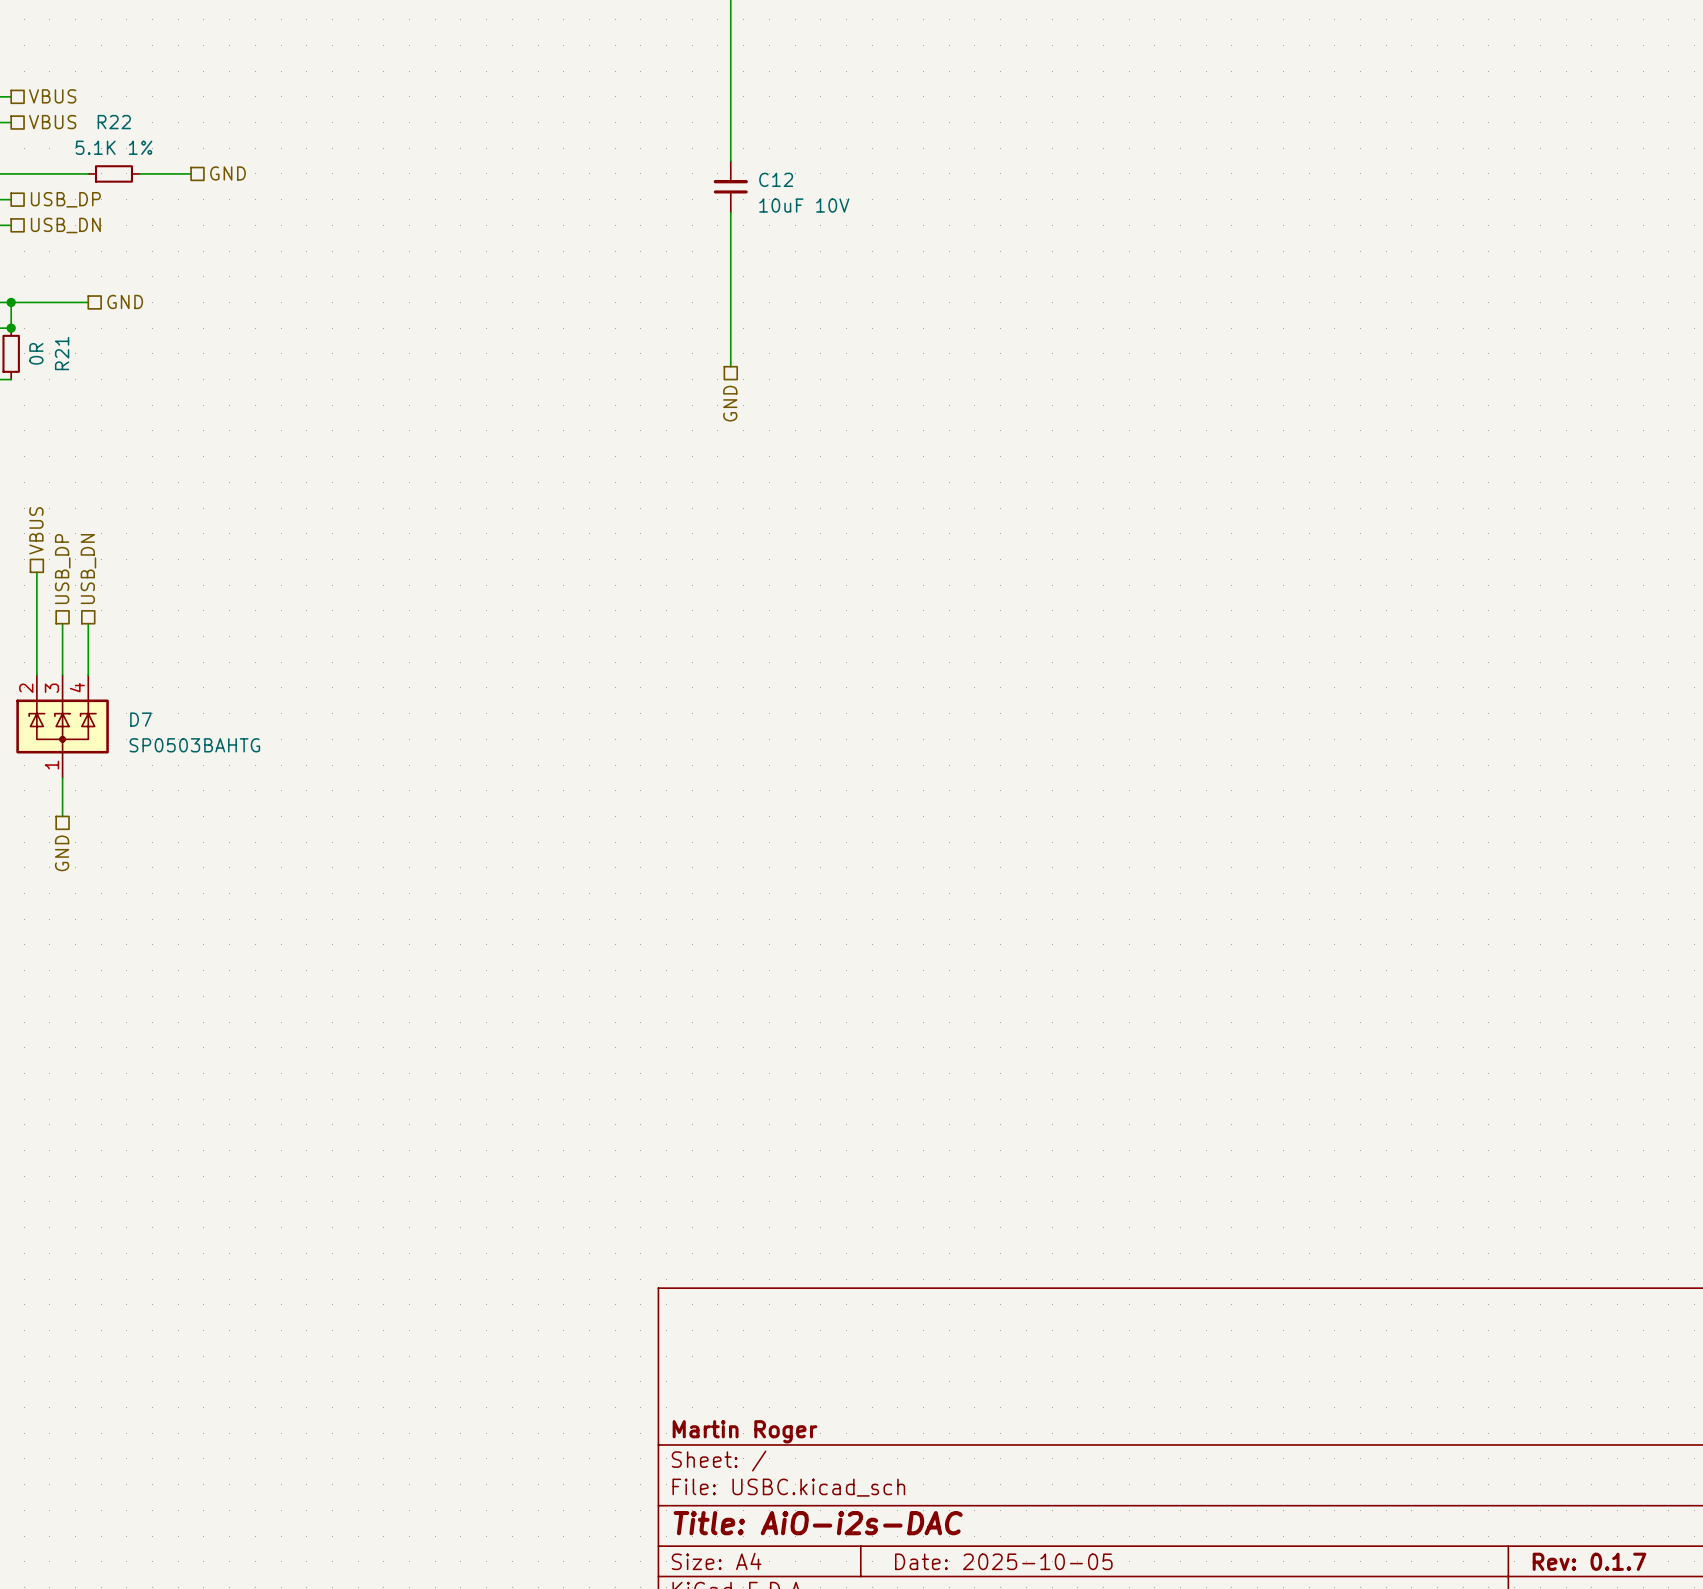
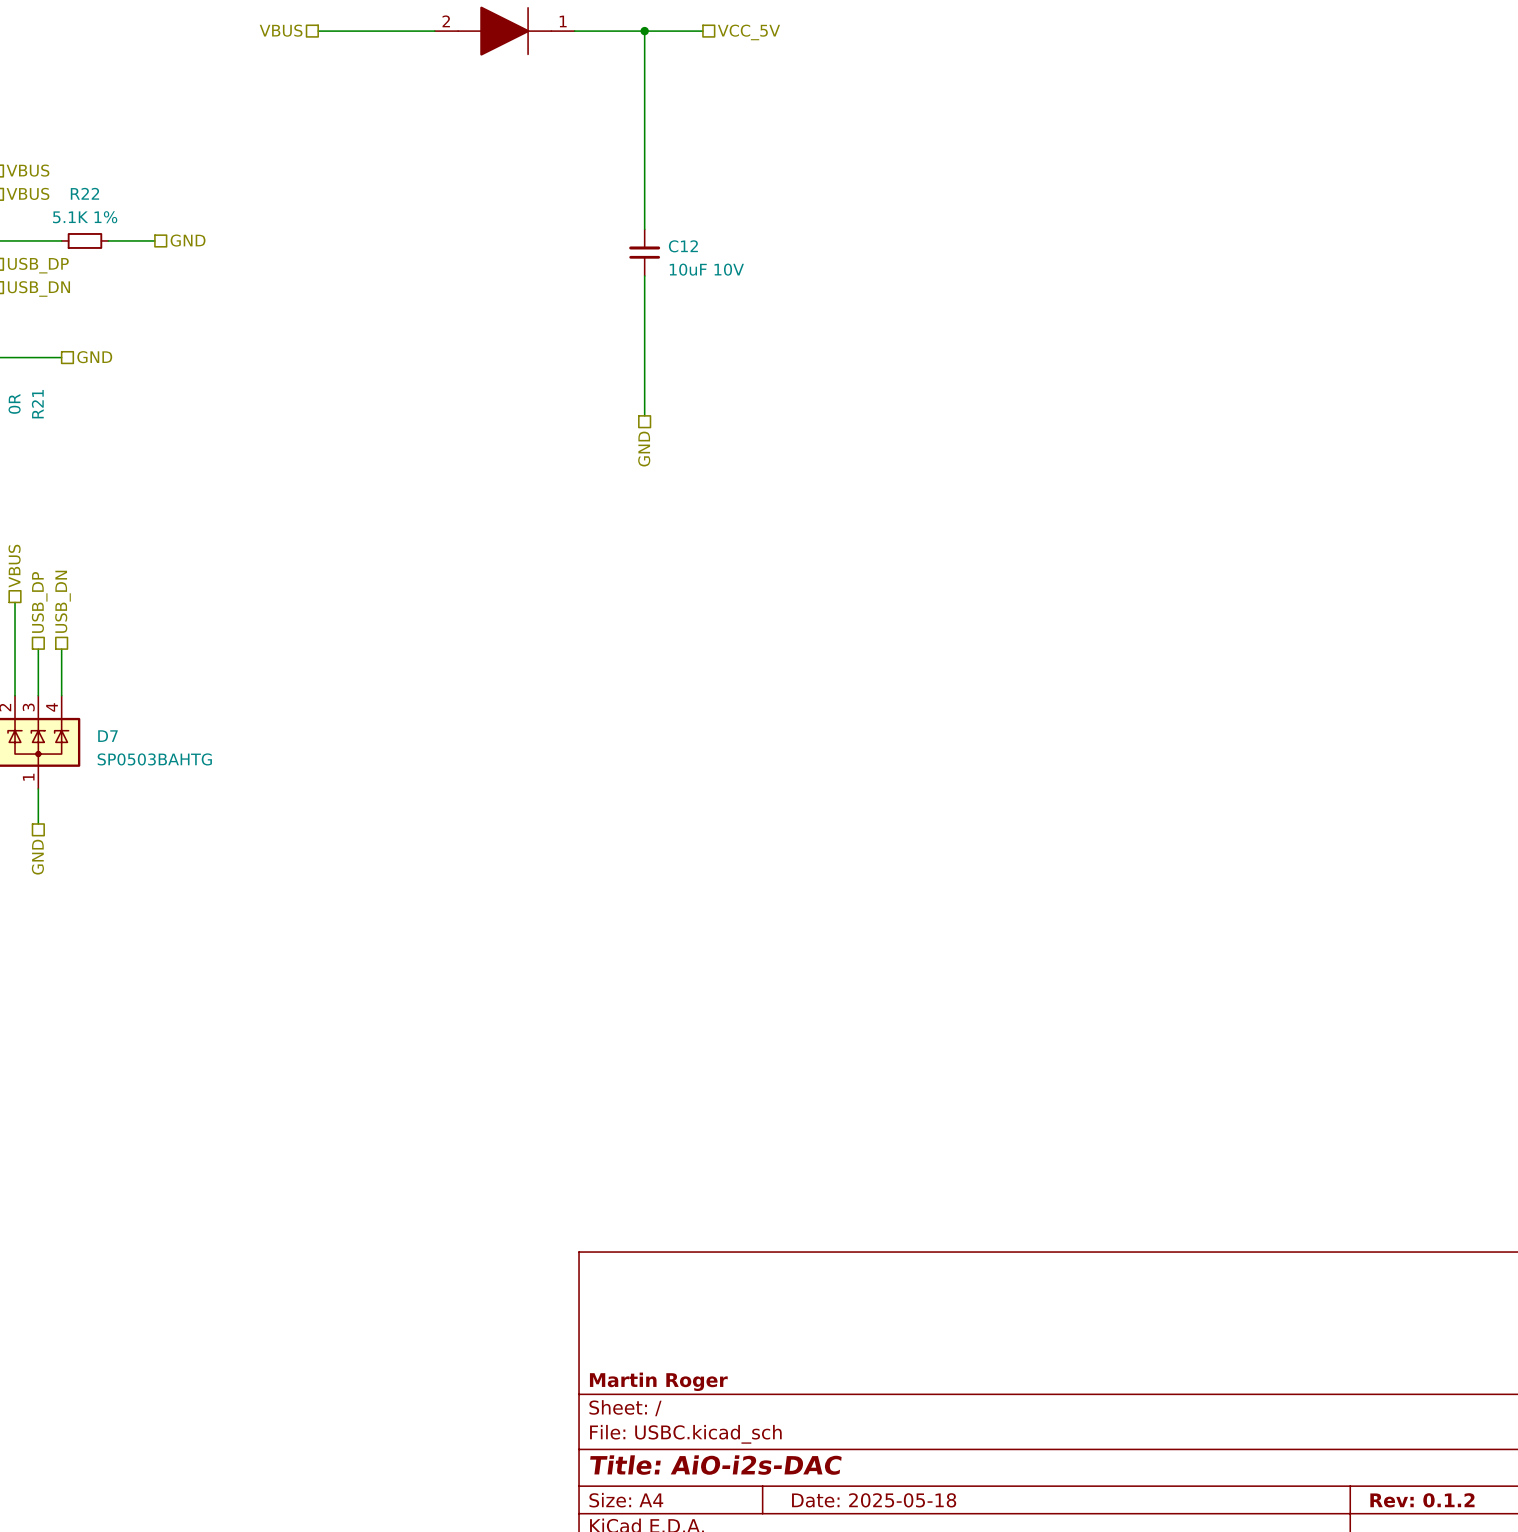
title block: Date: 2025-10-05 (1003, 1561) -> Date: 2025-05-18 (874, 1500)
title block: Rev: 0.1.7 (1589, 1561) -> Rev: 0.1.2 (1422, 1500)

